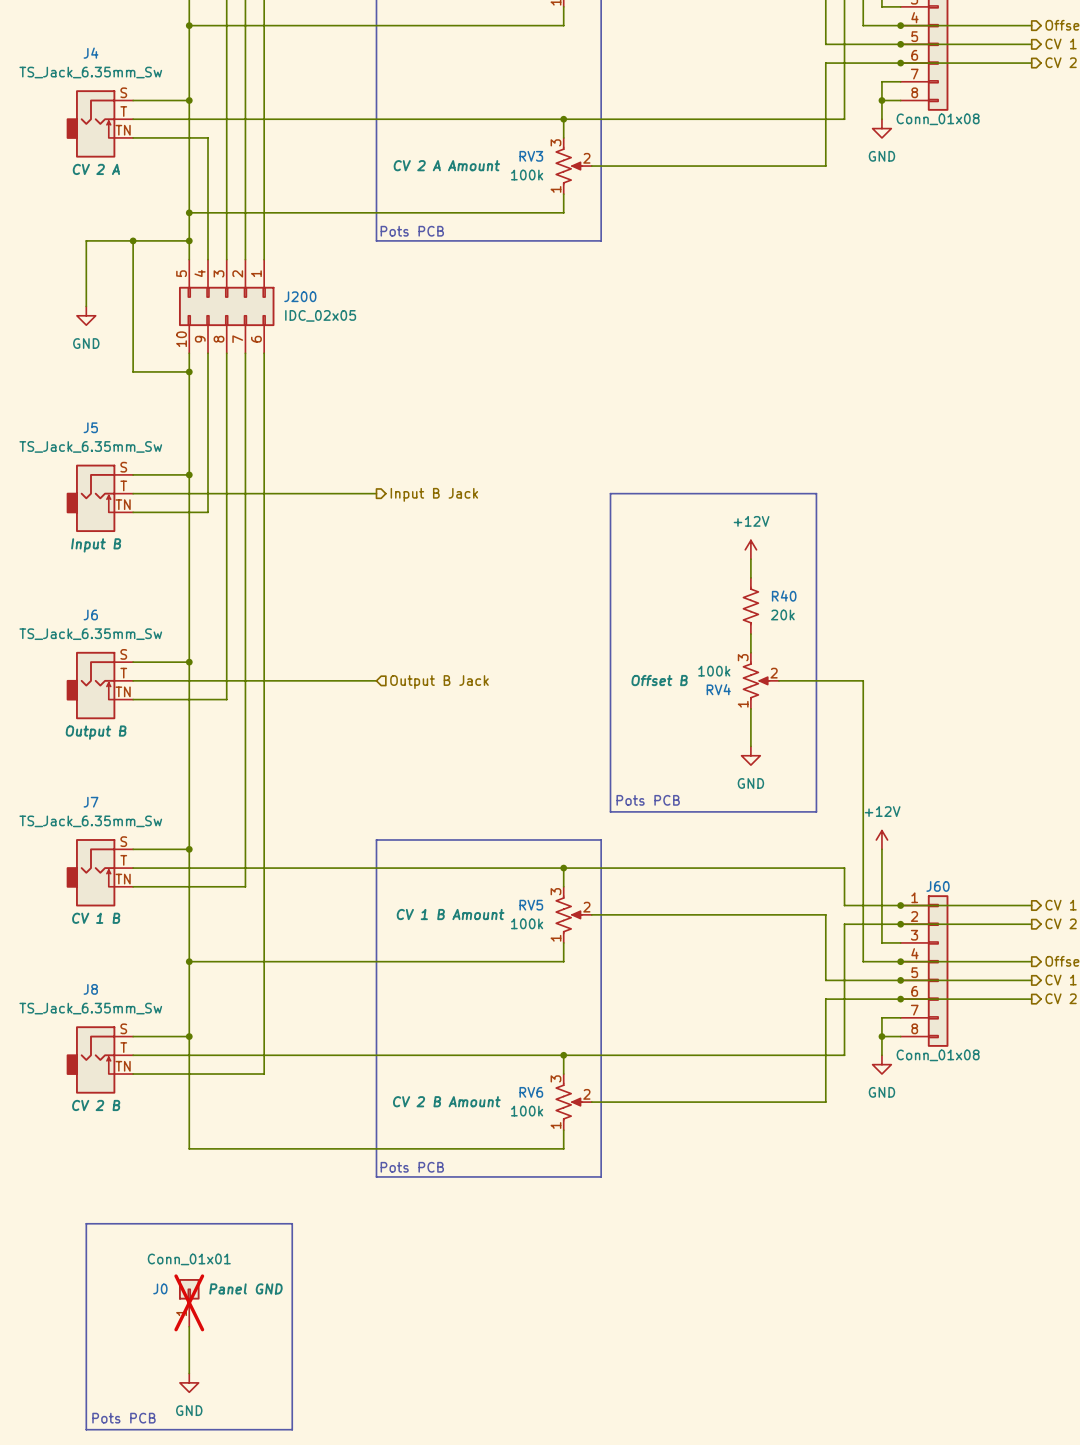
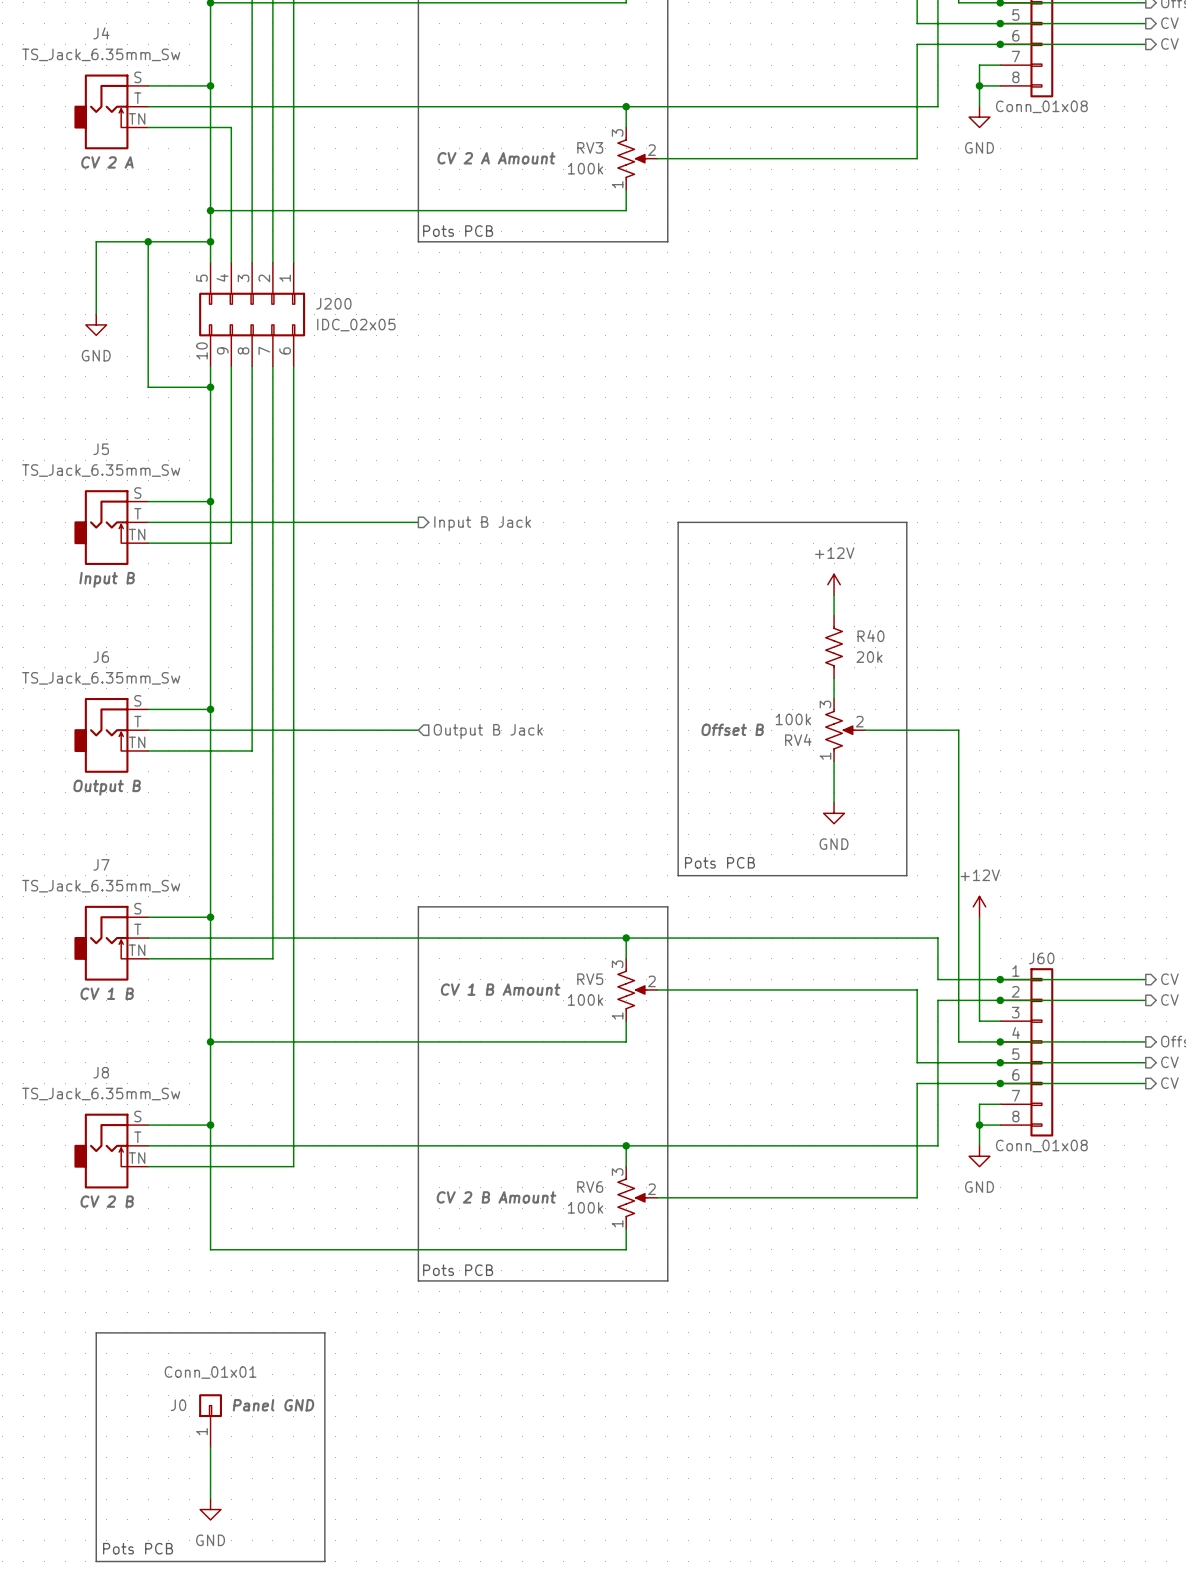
J0 do-not-place cross: (189, 1302) -> none

